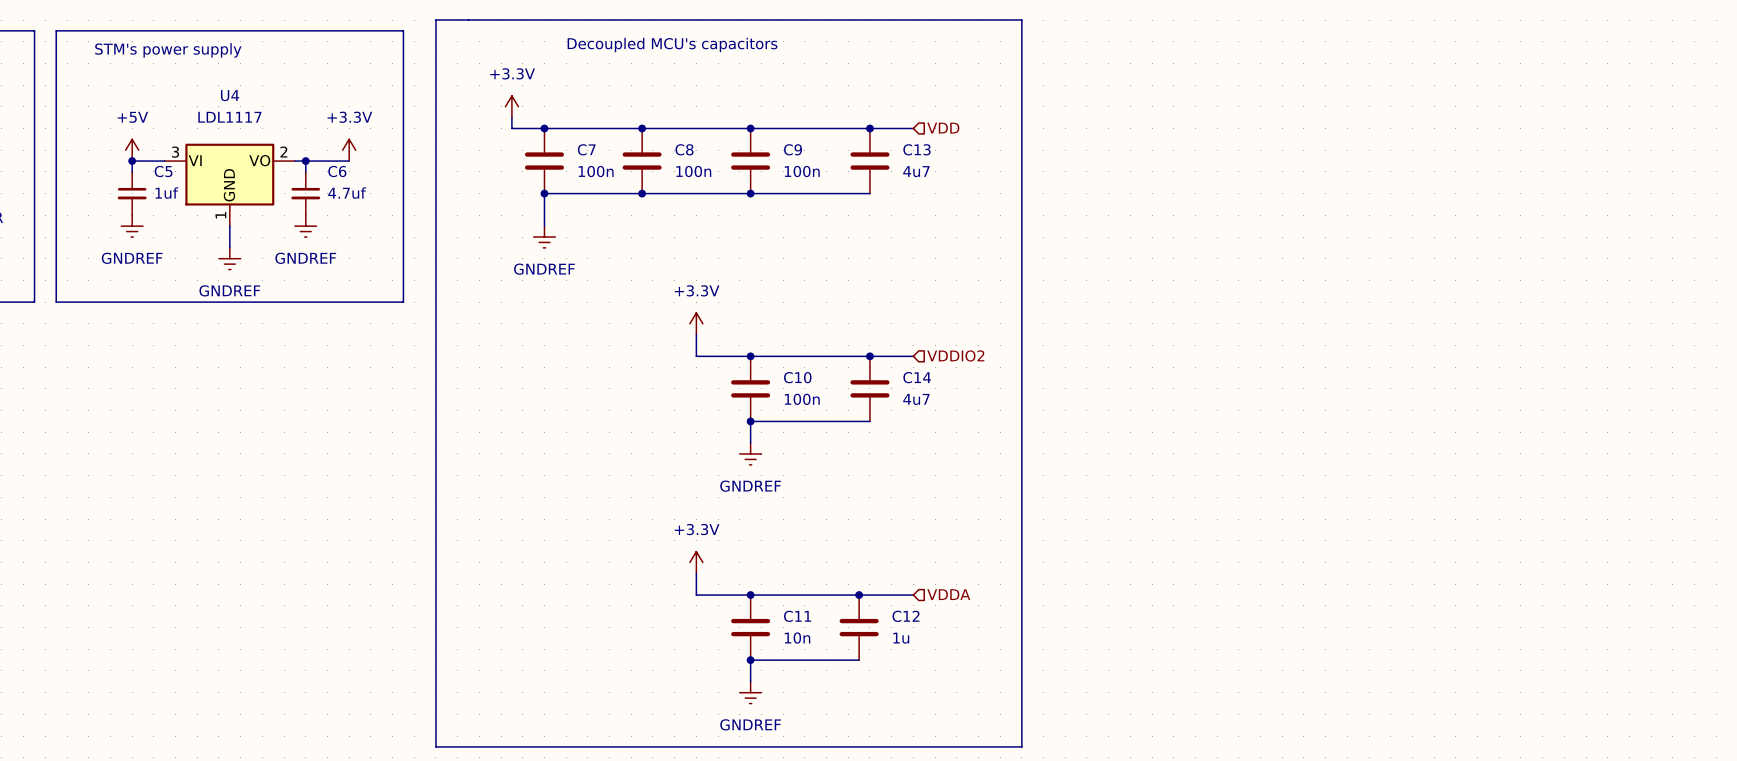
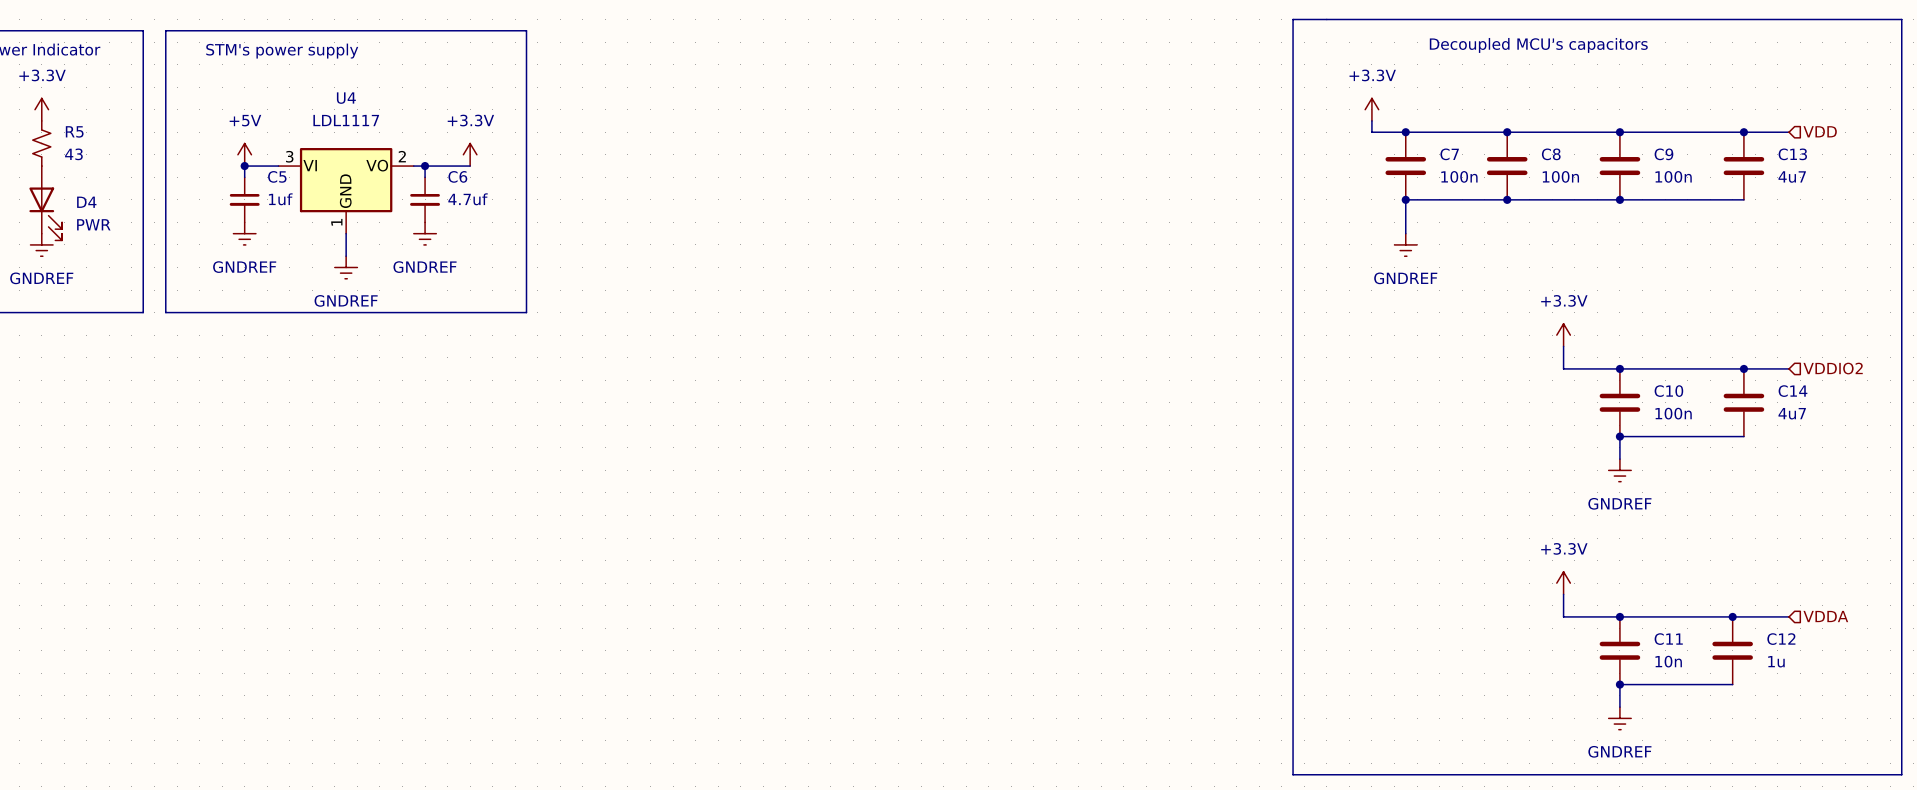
line: (435, 20) (435, 746) (1021, 746) (1021, 20) (435, 20) -> none
line: none -> (1293, 19) (1293, 774) (1901, 774) (1901, 19) (1293, 19)
text: Decoupled MCU's capacitors (672, 44) -> none
text: none -> Decoupled MCU's capacitors (1538, 45)
power symbol: +3.3V (511, 106) -> none
power symbol: none -> +3.3V (1371, 109)
wire: (511, 117) (511, 128) (913, 128) -> none
wire: none -> (1371, 120) (1371, 132) (1789, 132)
junction: (544, 128) -> none
junction: (642, 128) -> none
junction: (750, 128) -> none
junction: (869, 128) -> none
hierarchical label: VDD (943, 128) -> none
junction: none -> (1405, 132)
junction: none -> (1507, 132)
junction: none -> (1619, 132)
junction: none -> (1743, 132)
hierarchical label: none -> VDD (1820, 131)
C7 position: (544, 161) -> (1405, 166)
C8 position: (642, 161) -> (1507, 166)
C9 position: (750, 161) -> (1619, 166)
C13 position: (869, 161) -> (1743, 166)
junction: (544, 193) -> none
junction: (642, 193) -> none
junction: (750, 193) -> none
wire: (869, 193) (544, 193) (544, 226) -> none
junction: none -> (1405, 199)
junction: none -> (1507, 199)
junction: none -> (1619, 199)
wire: none -> (1743, 199) (1405, 199) (1405, 233)
power symbol: GNDREF (544, 237) -> none
power symbol: none -> GNDREF (1405, 244)
power symbol: +3.3V (696, 323) -> none
power symbol: none -> +3.3V (1563, 335)
wire: (696, 334) (696, 356) (913, 356) -> none
wire: none -> (1563, 346) (1563, 368) (1789, 368)
hierarchical label: VDDIO2 (955, 355) -> none
hierarchical label: none -> VDDIO2 (1833, 368)
junction: (750, 356) -> none
junction: (869, 356) -> none
junction: none -> (1619, 368)
junction: none -> (1743, 368)
C10 position: (750, 388) -> (1619, 402)
C14 position: (869, 388) -> (1743, 402)
junction: (750, 421) -> none
wire: (869, 421) (750, 421) (750, 443) -> none
junction: none -> (1619, 436)
wire: none -> (1743, 436) (1619, 436) (1619, 459)
power symbol: GNDREF (750, 453) -> none
power symbol: none -> GNDREF (1619, 470)
power symbol: +3.3V (696, 562) -> none
power symbol: none -> +3.3V (1563, 583)
wire: (696, 573) (696, 595) (913, 595) -> none
wire: none -> (1563, 594) (1563, 616) (1789, 616)
hierarchical label: VDDA (948, 594) -> none
hierarchical label: none -> VDDA (1825, 616)
junction: (750, 595) -> none
junction: (859, 595) -> none
junction: none -> (1619, 616)
junction: none -> (1732, 616)
C11 position: (750, 627) -> (1619, 650)
C12 position: (859, 627) -> (1732, 650)
junction: (750, 660) -> none
wire: (859, 660) (750, 660) (750, 681) -> none
junction: none -> (1619, 684)
wire: none -> (1732, 684) (1619, 684) (1619, 707)
power symbol: GNDREF (750, 692) -> none
power symbol: none -> GNDREF (1619, 718)

